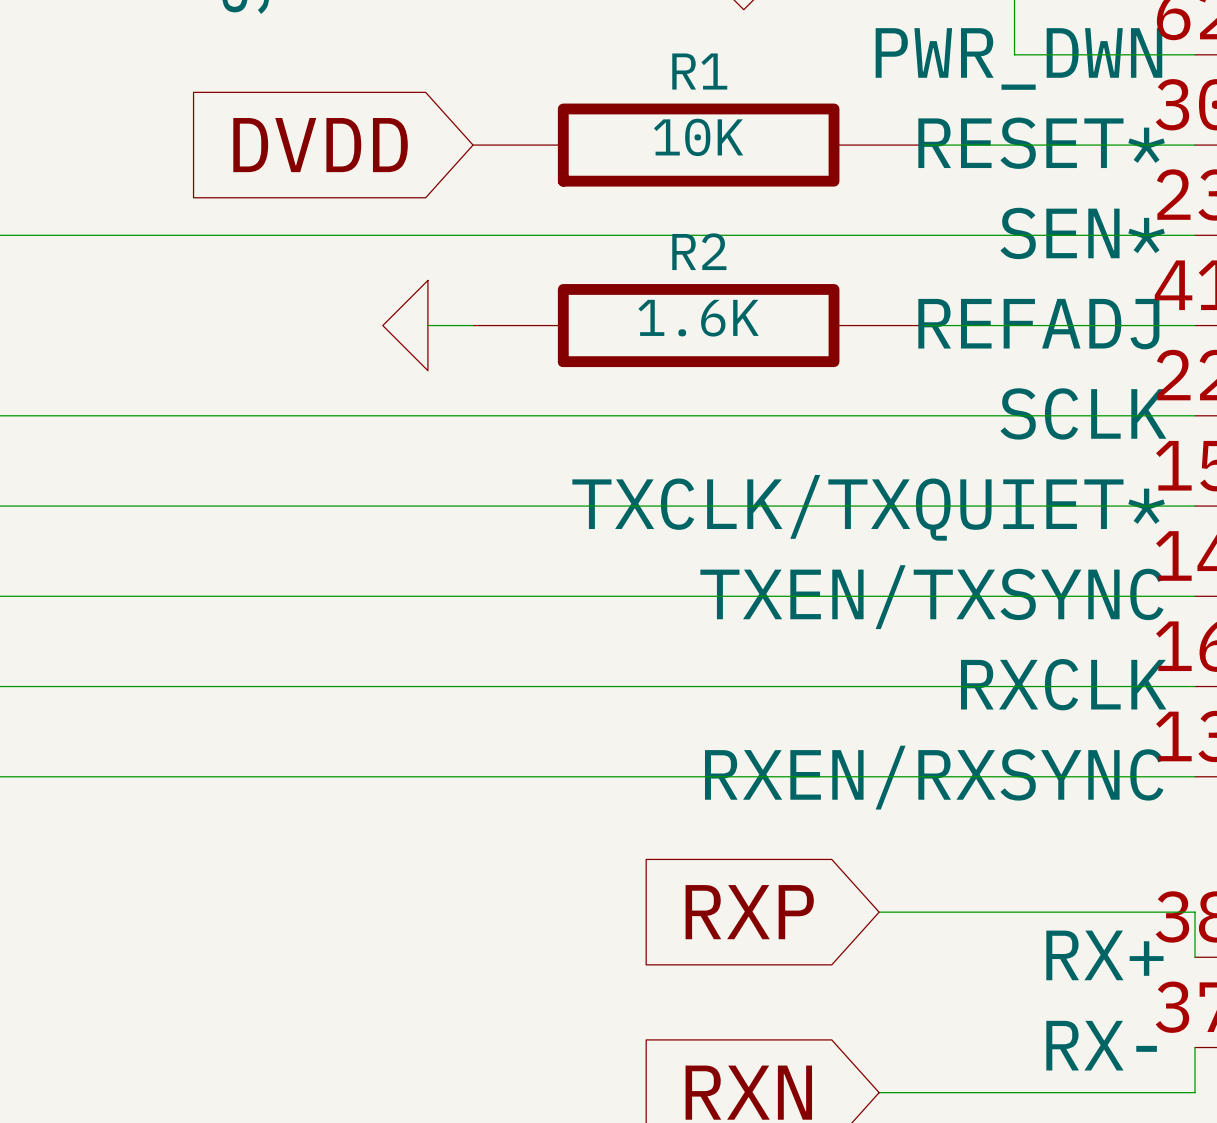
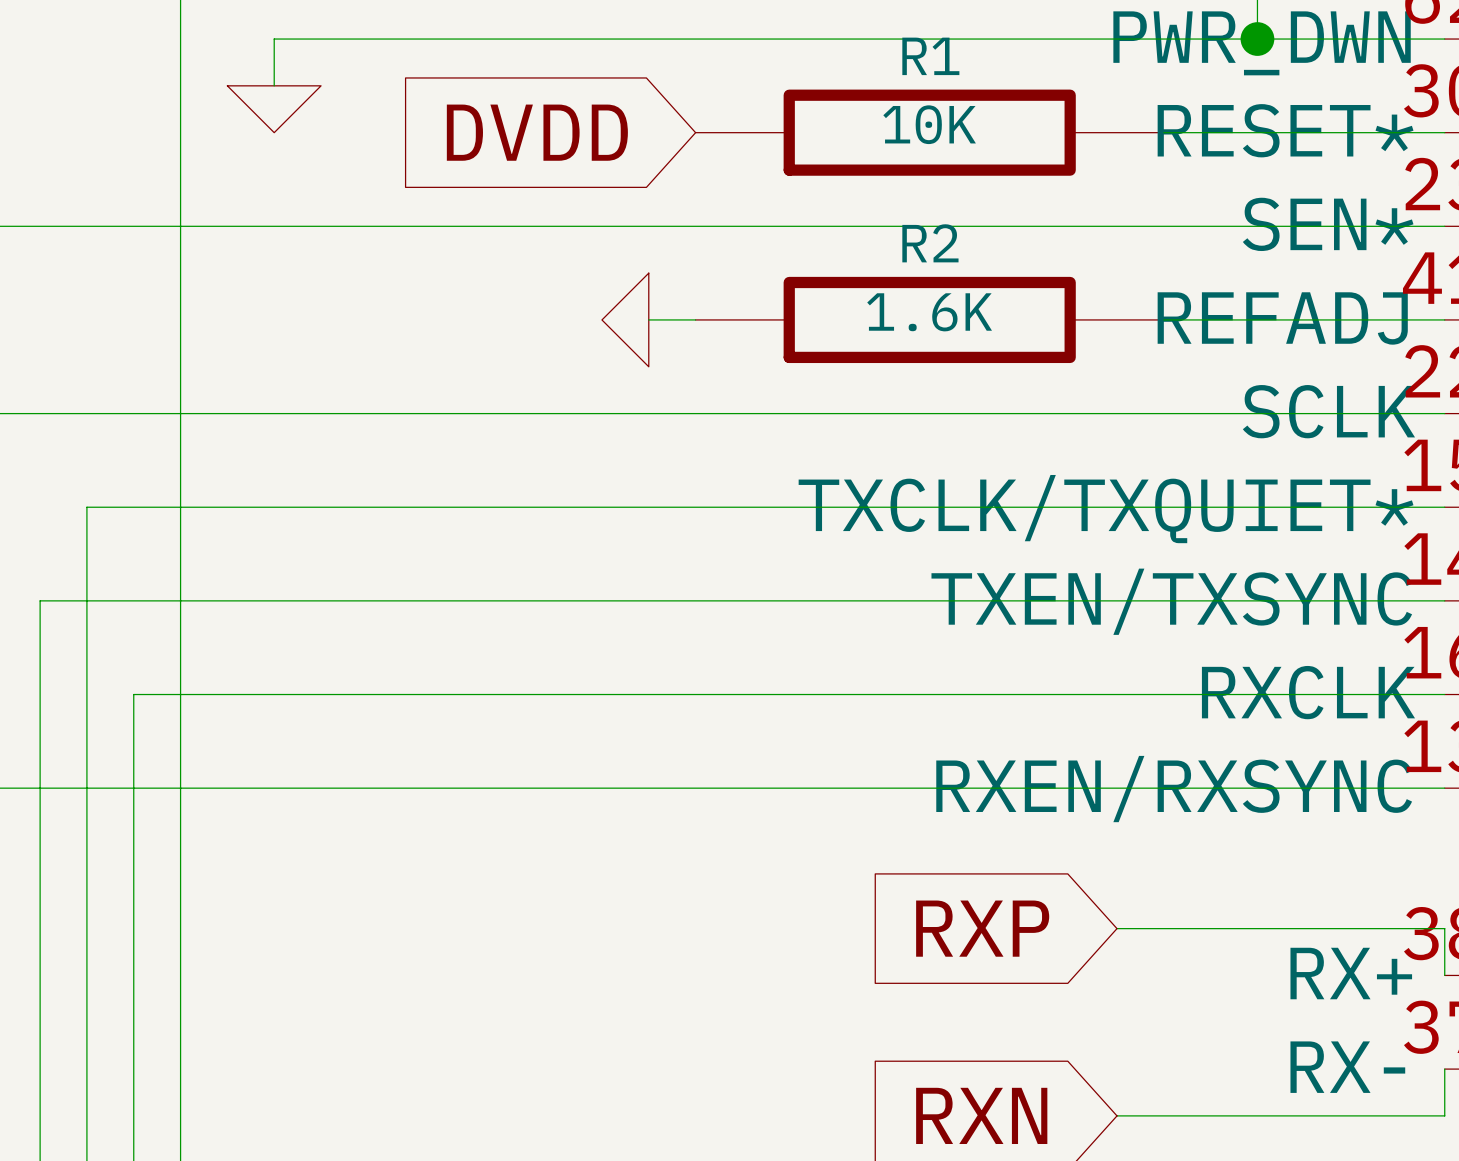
wire: none -> (1257, 39) (274, 39) (274, 85)
junction: none -> (1257, 39)
power symbol: none -> (274, 109)

